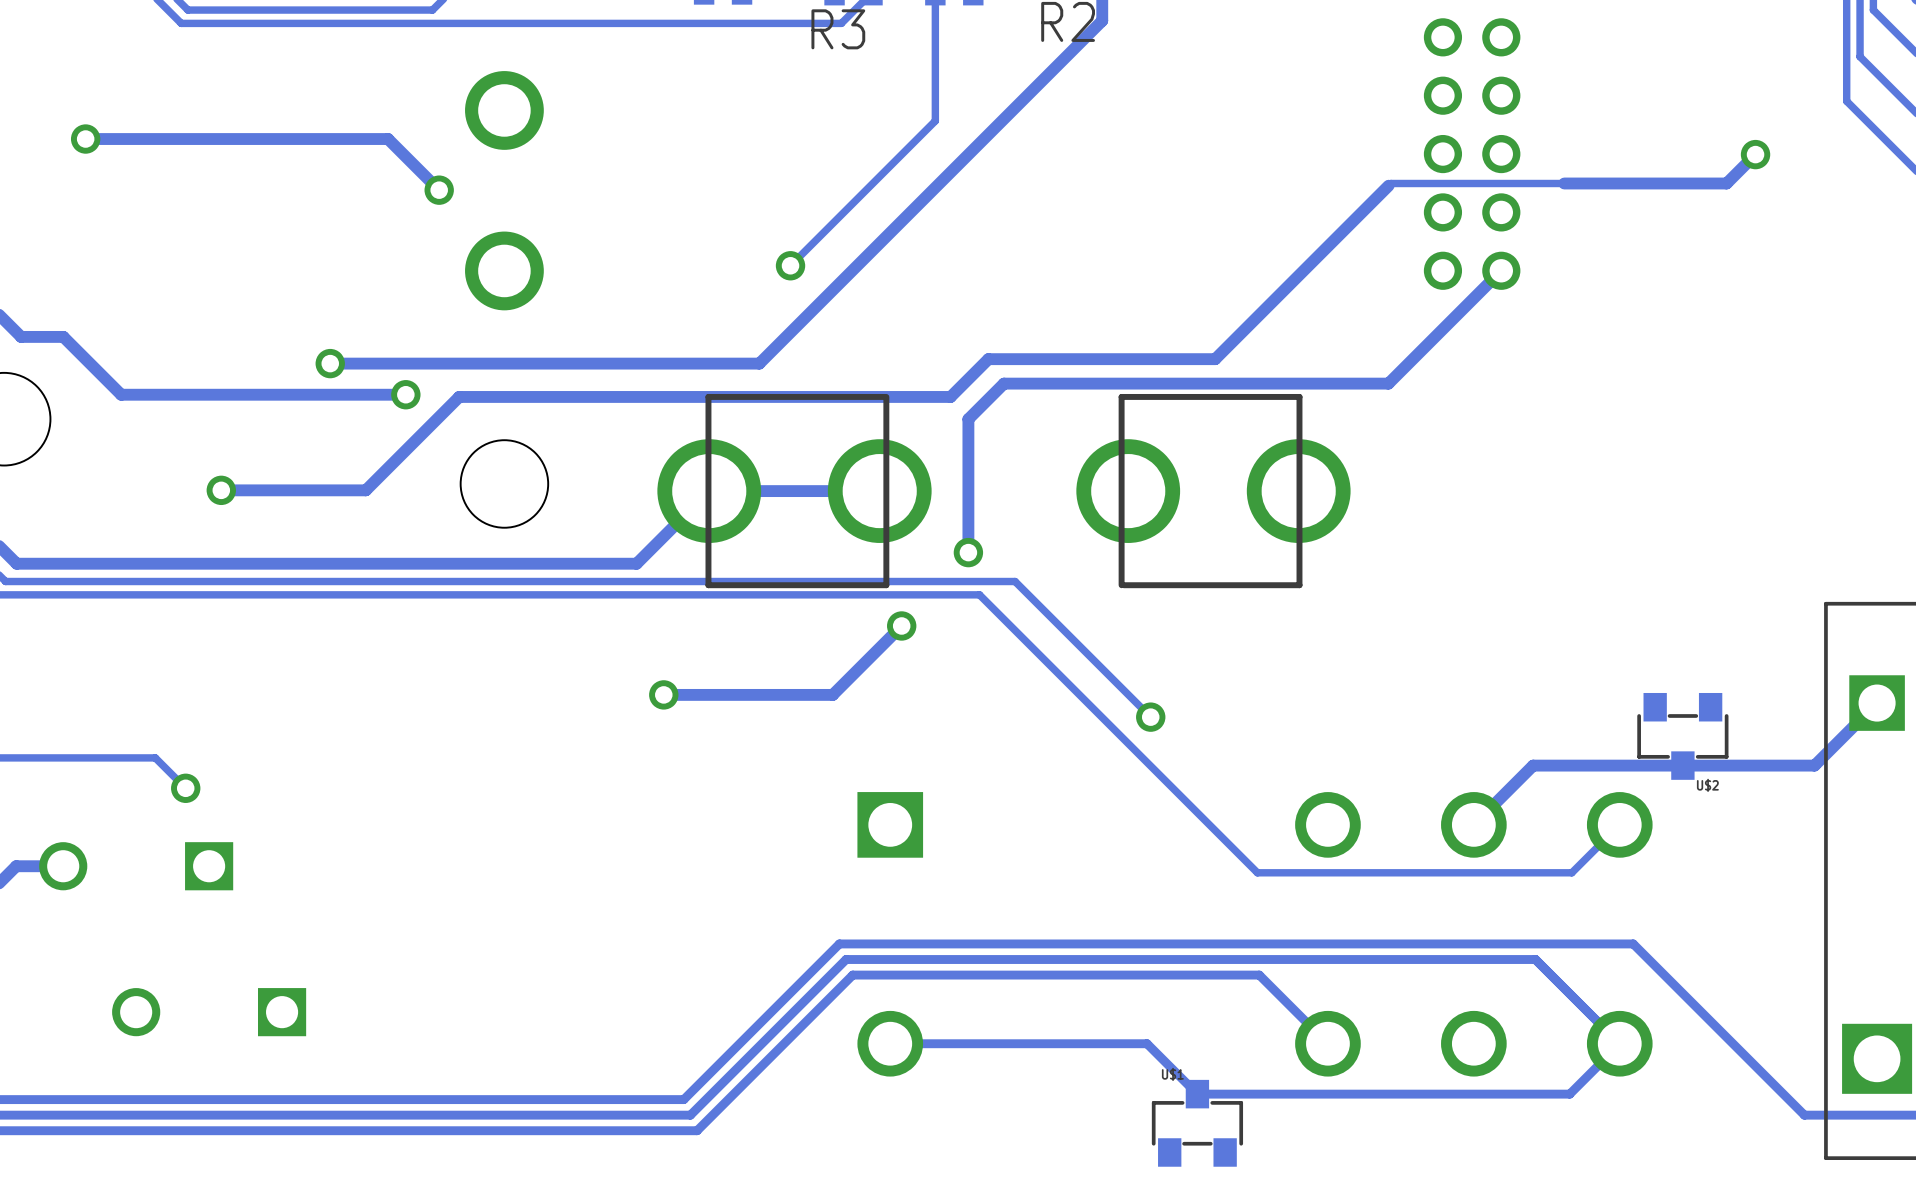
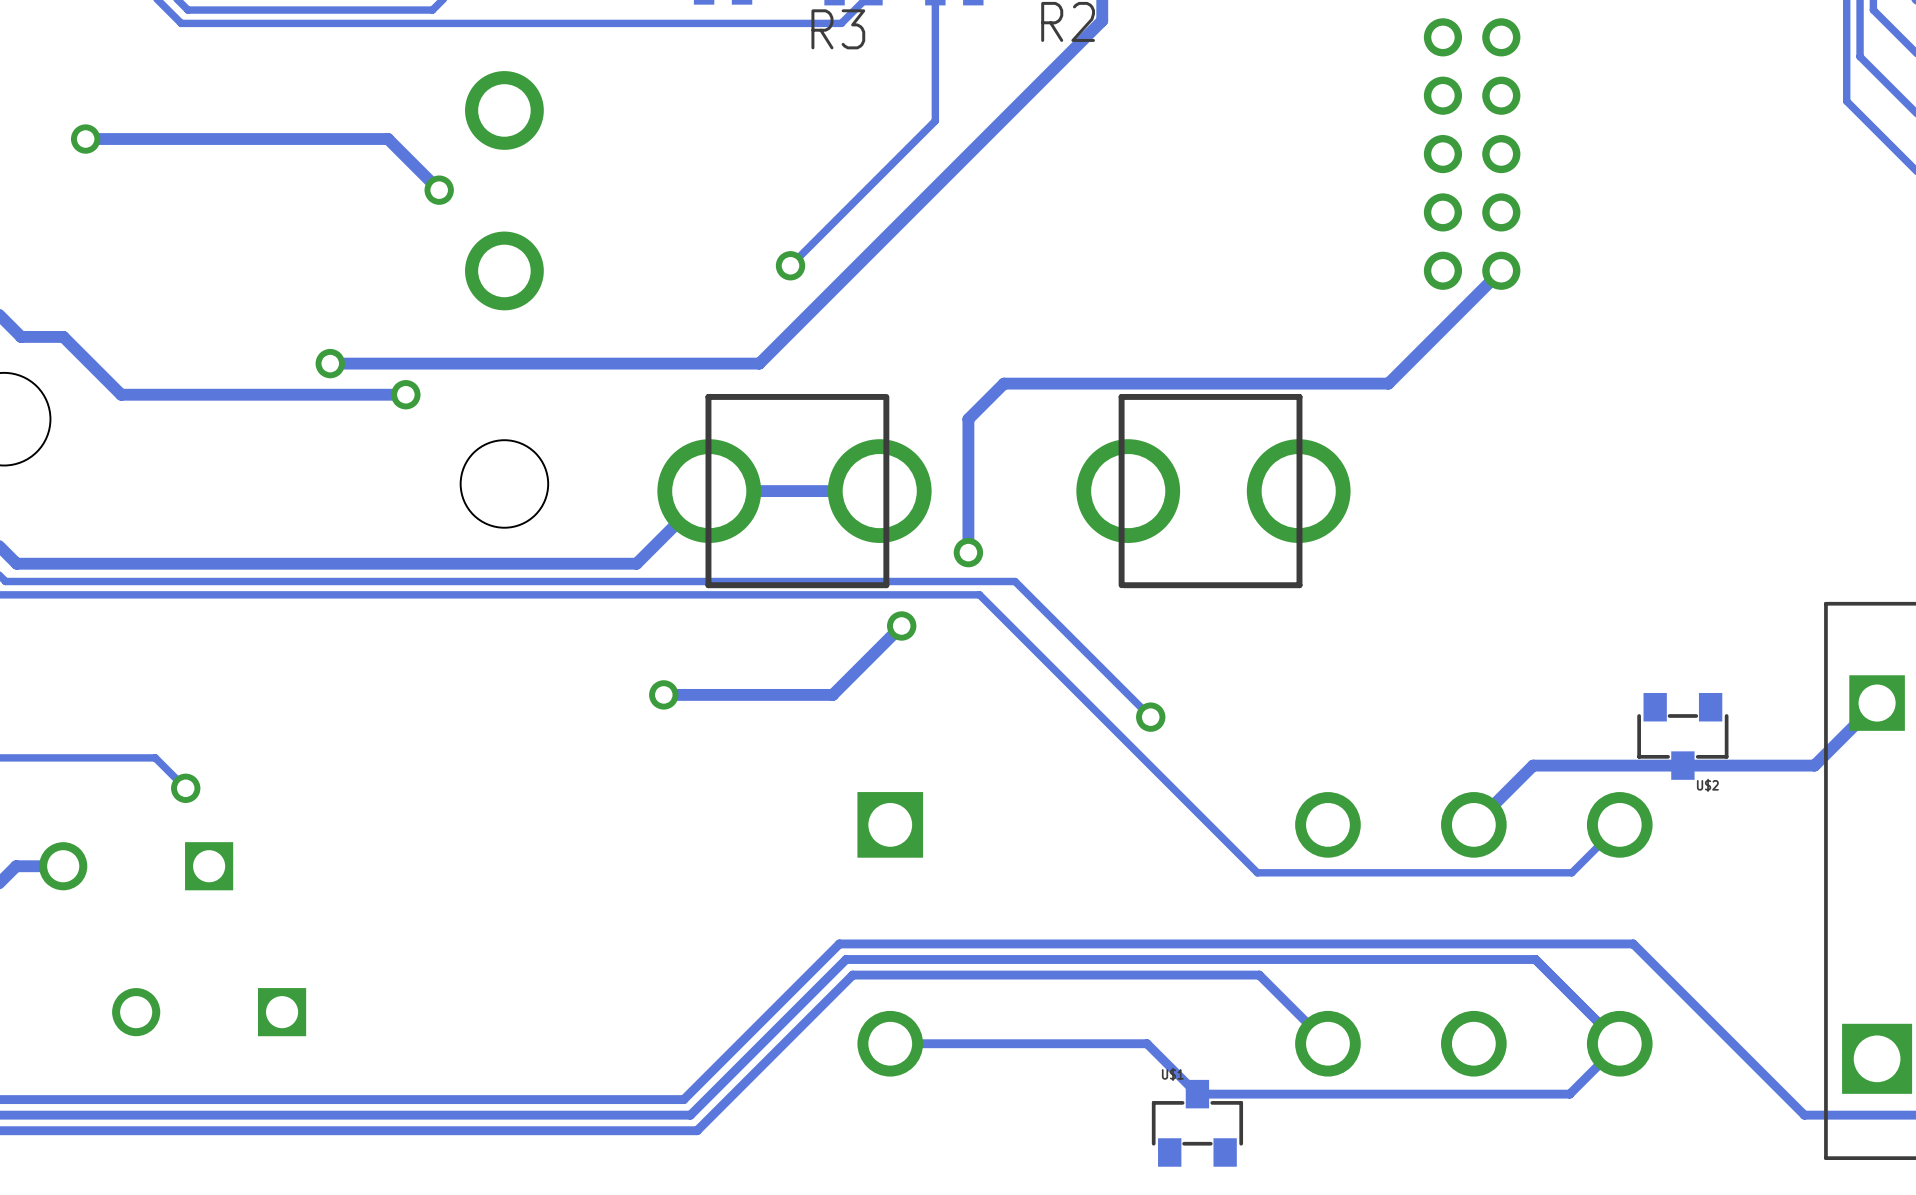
track: (1755, 154) (1726, 183) (1390, 183) (1215, 359) (988, 359) (950, 396) (459, 396) (365, 490) (221, 490) -> none
via: (1755, 154) -> none
via: (221, 490) -> none

